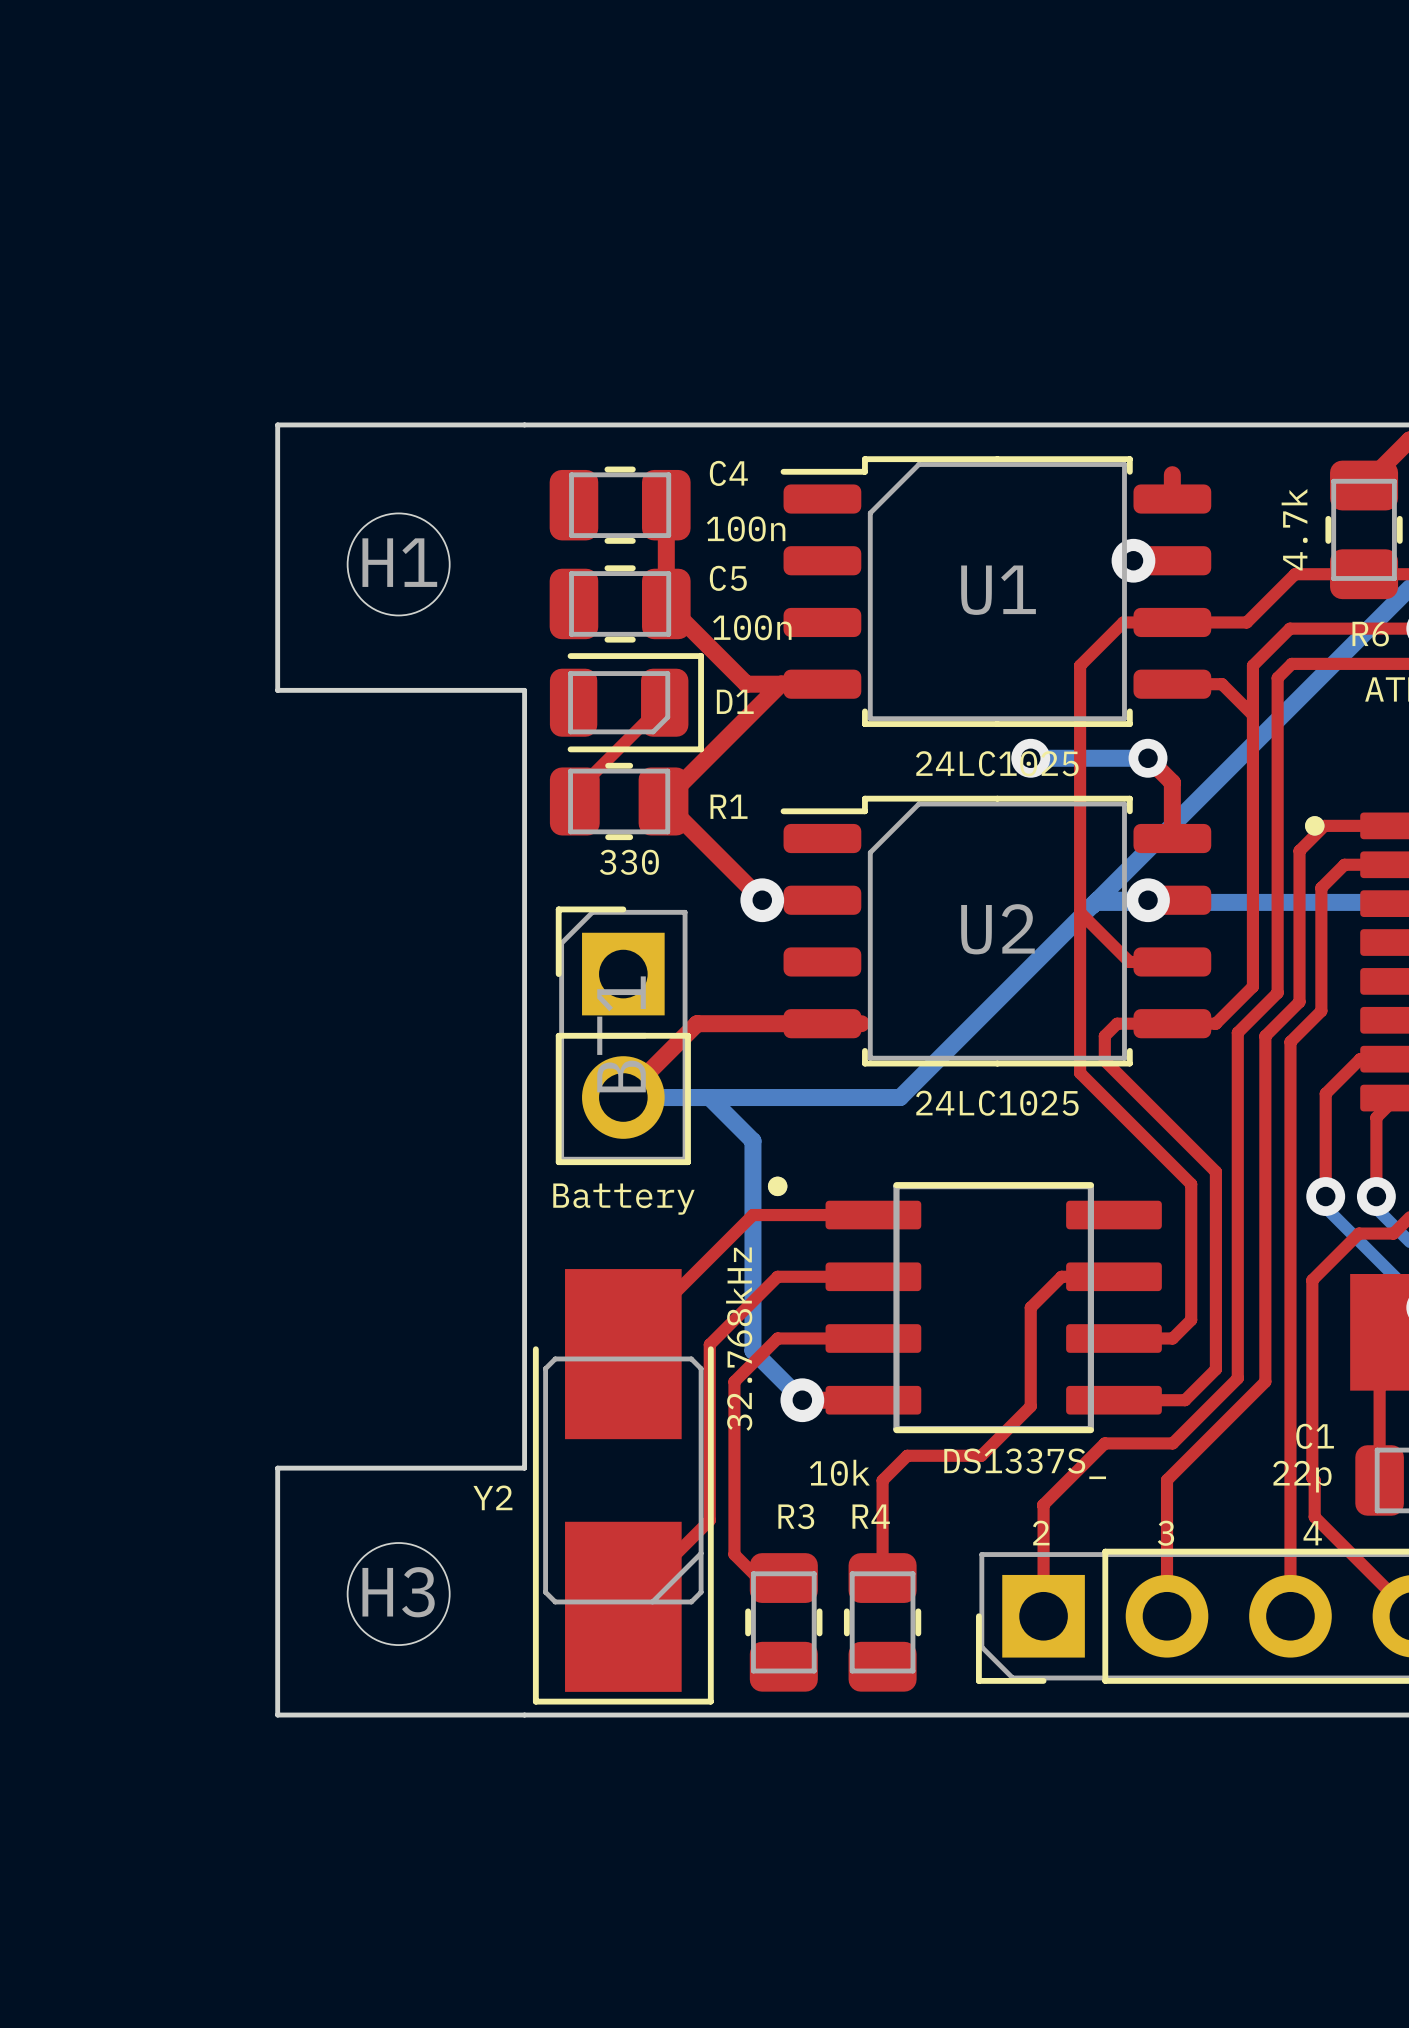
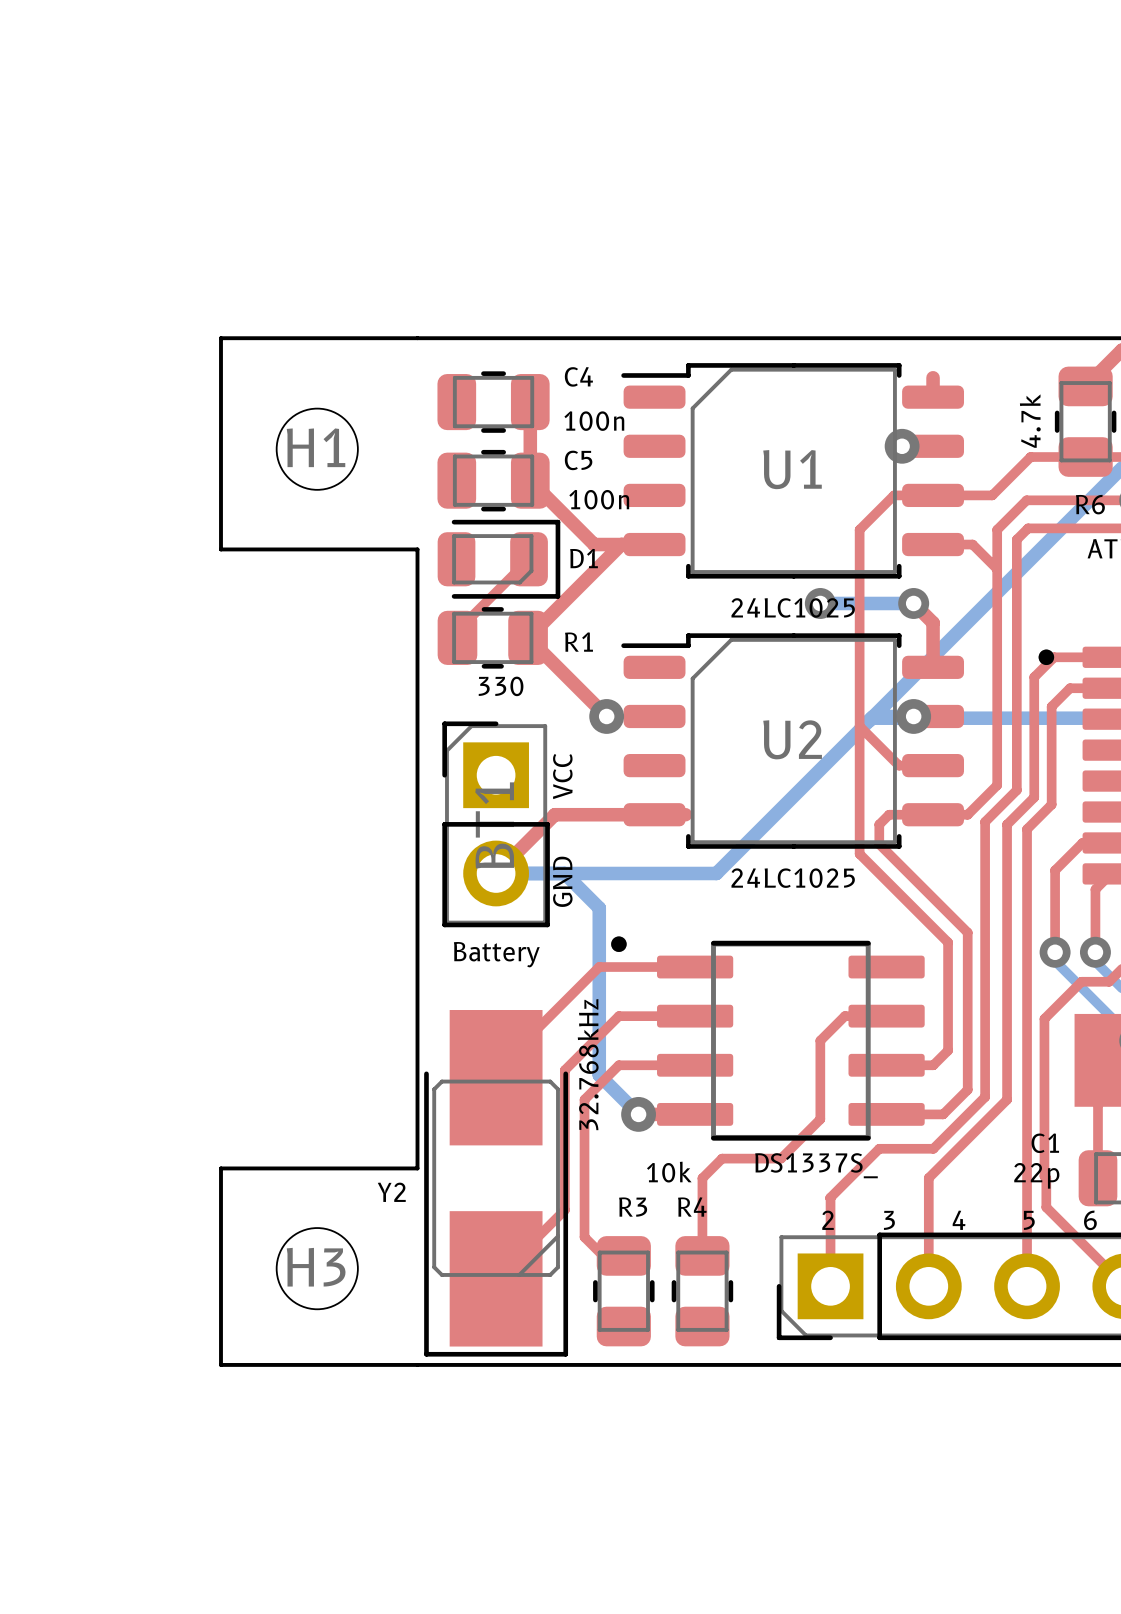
text: none -> VCC (562, 776)
text: none -> GND (562, 881)

